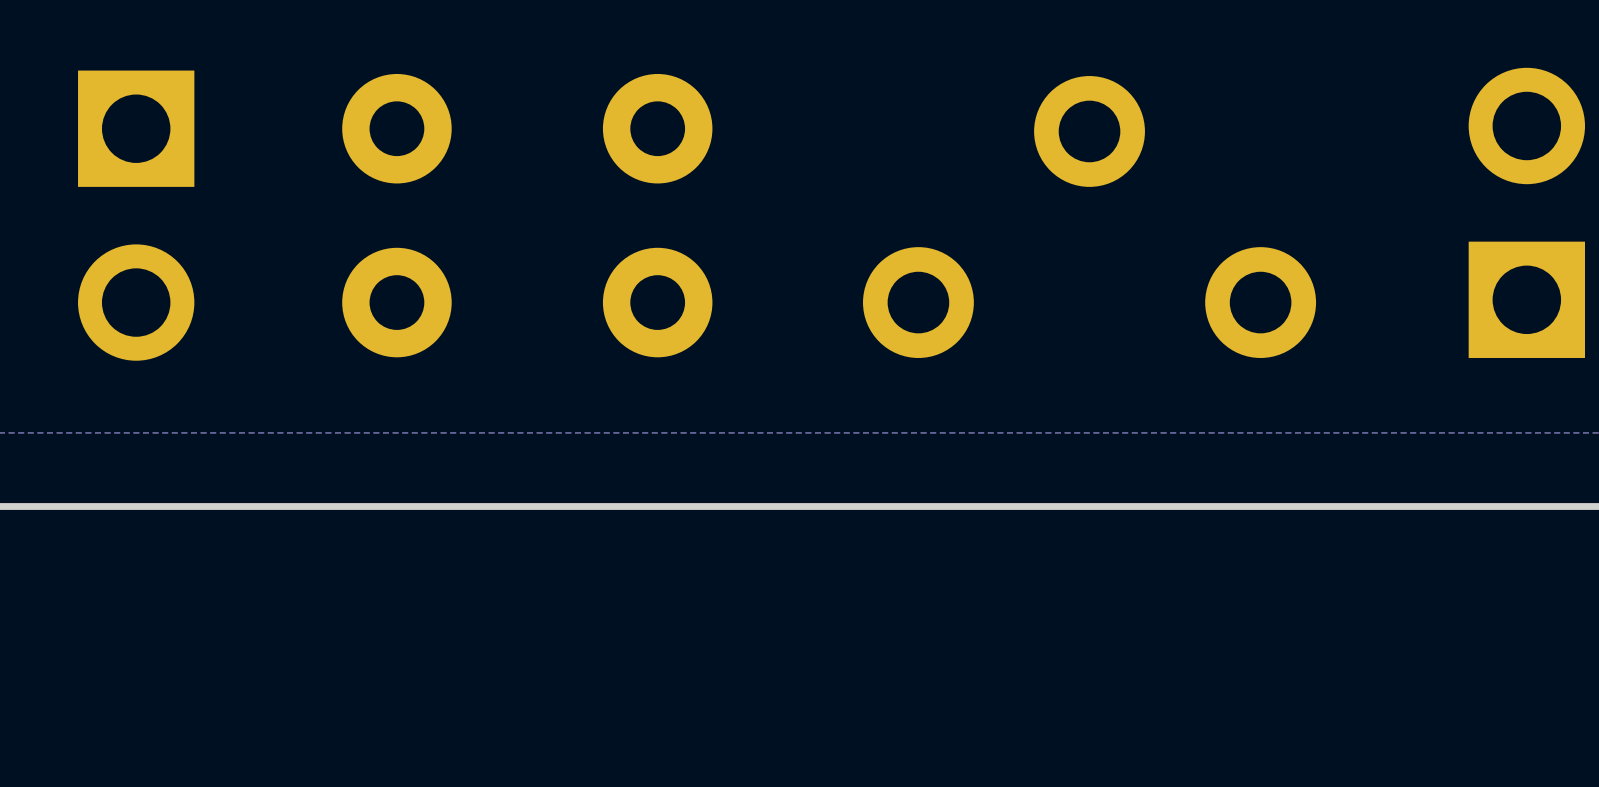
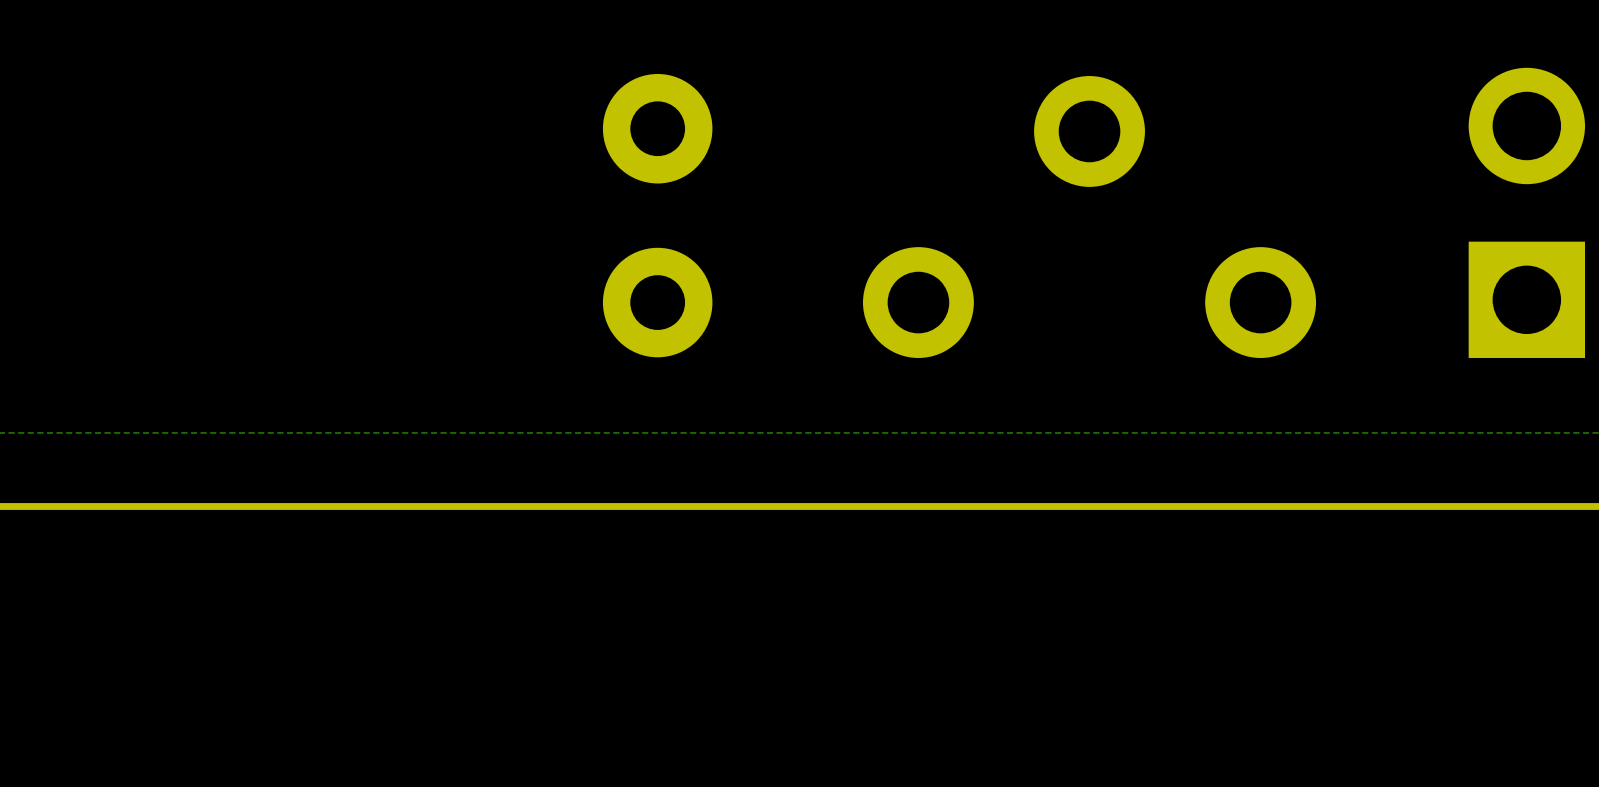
part: (136, 215) -> none
part: (396, 215) -> none

